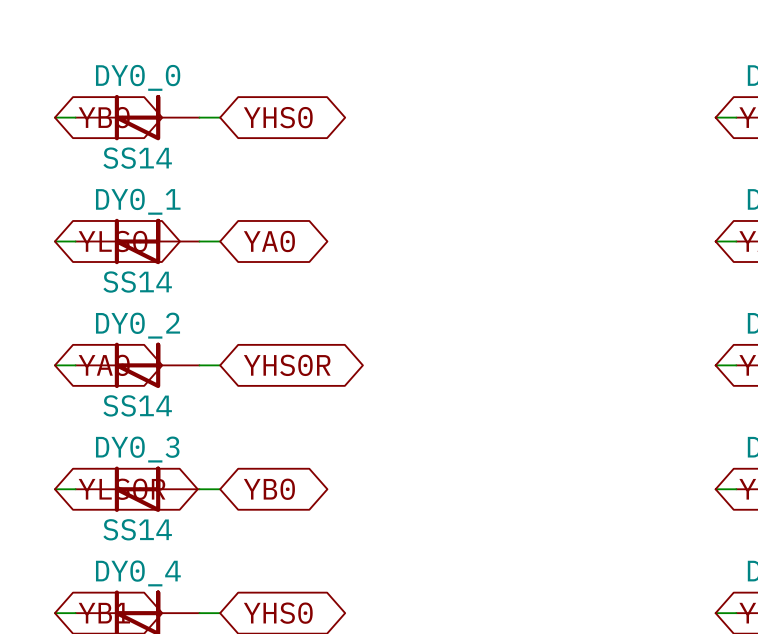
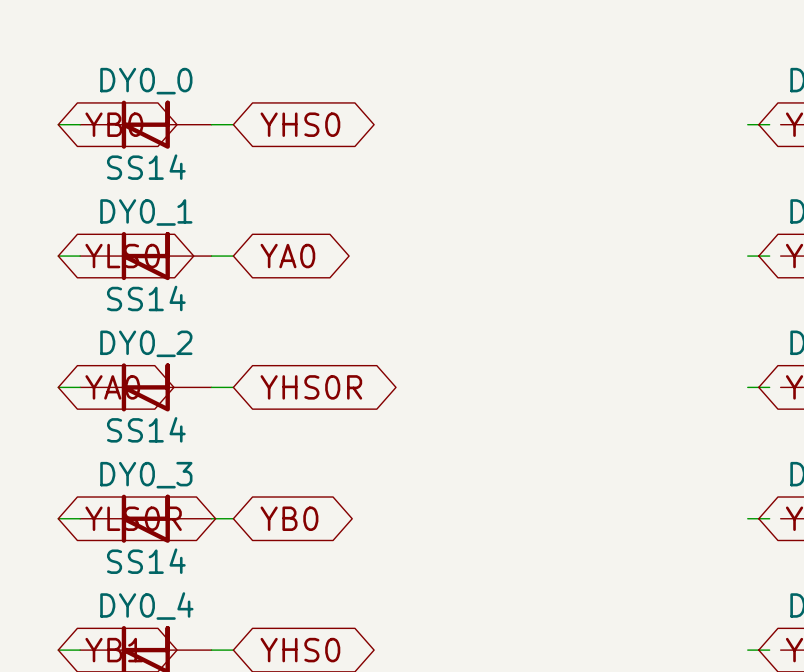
wire: (725, 117) (736, 117) -> (747, 124) (758, 124)
wire: (725, 241) (736, 241) -> (747, 256) (758, 256)
wire: (725, 365) (736, 365) -> (747, 387) (758, 387)
wire: (725, 489) (736, 489) -> (747, 518) (758, 518)
wire: (725, 613) (736, 613) -> (747, 650) (758, 650)

